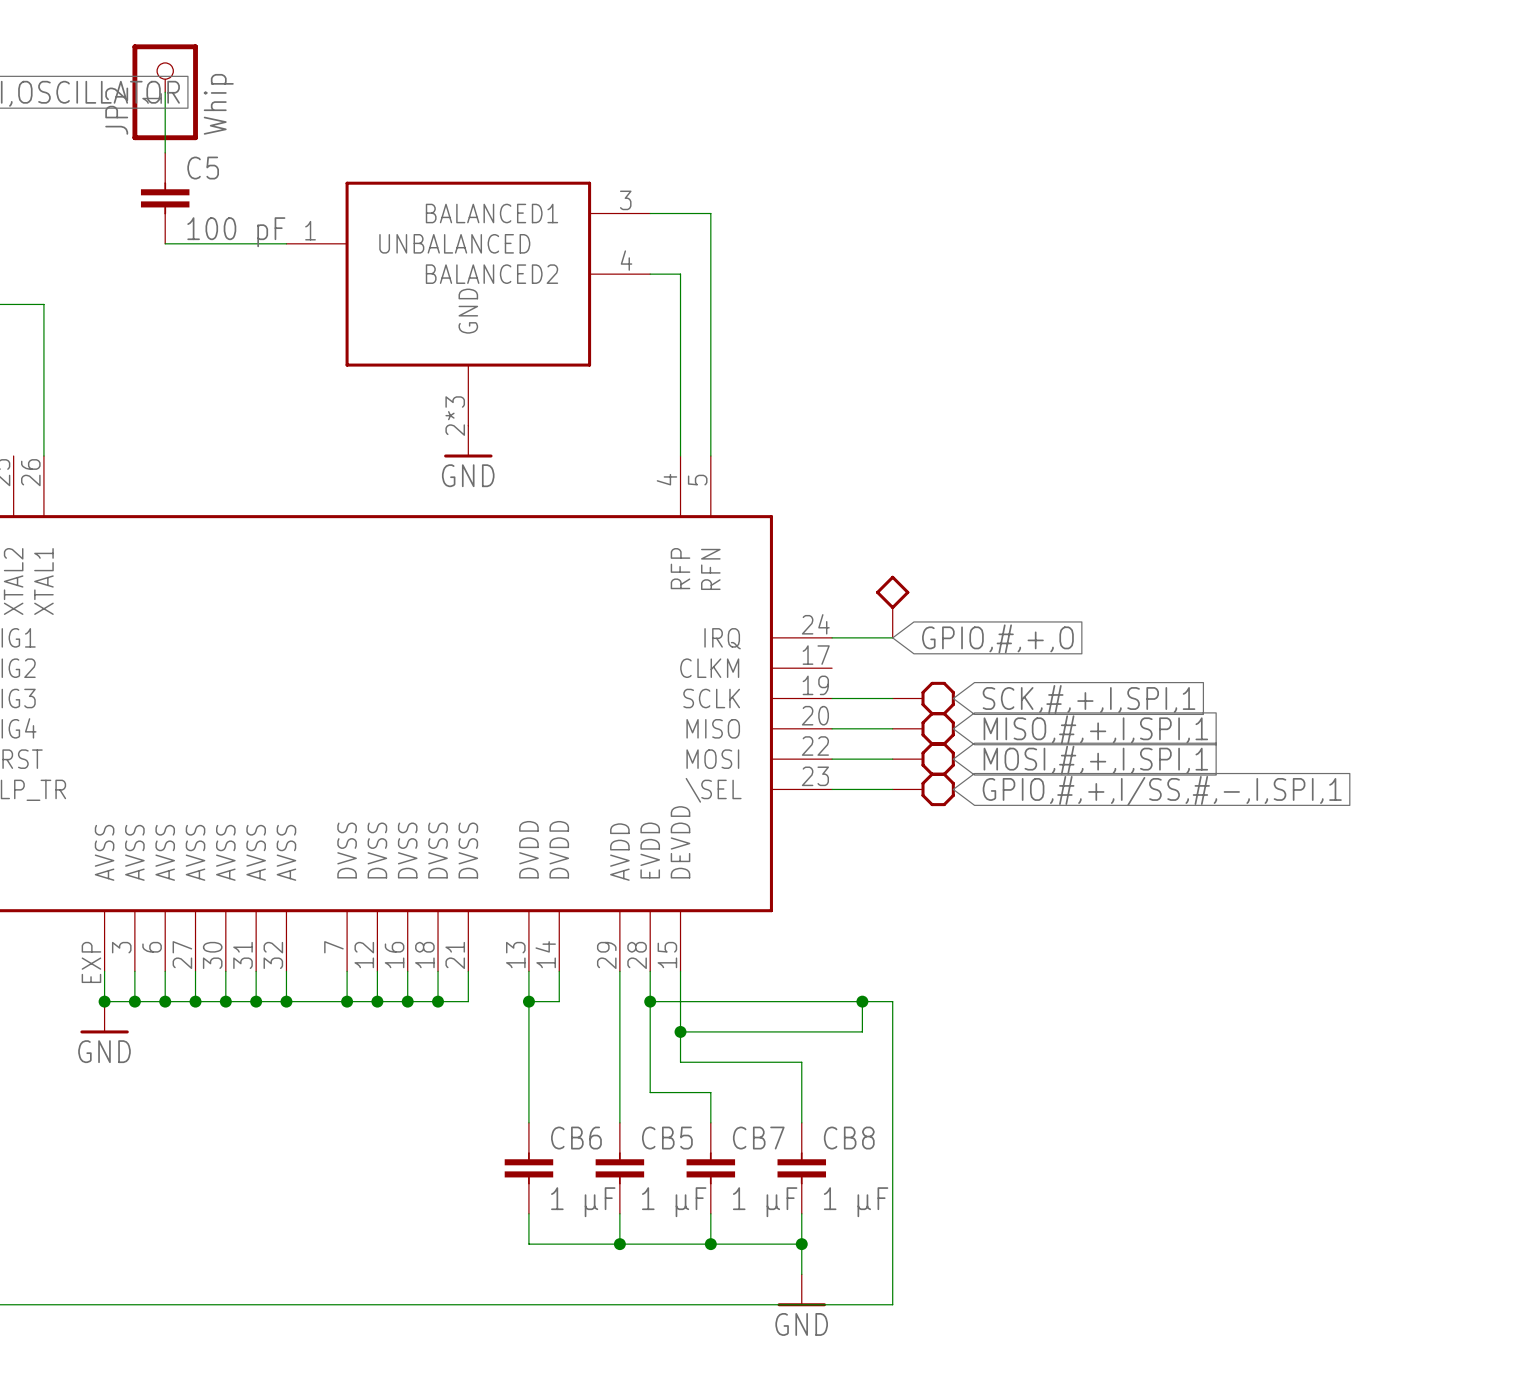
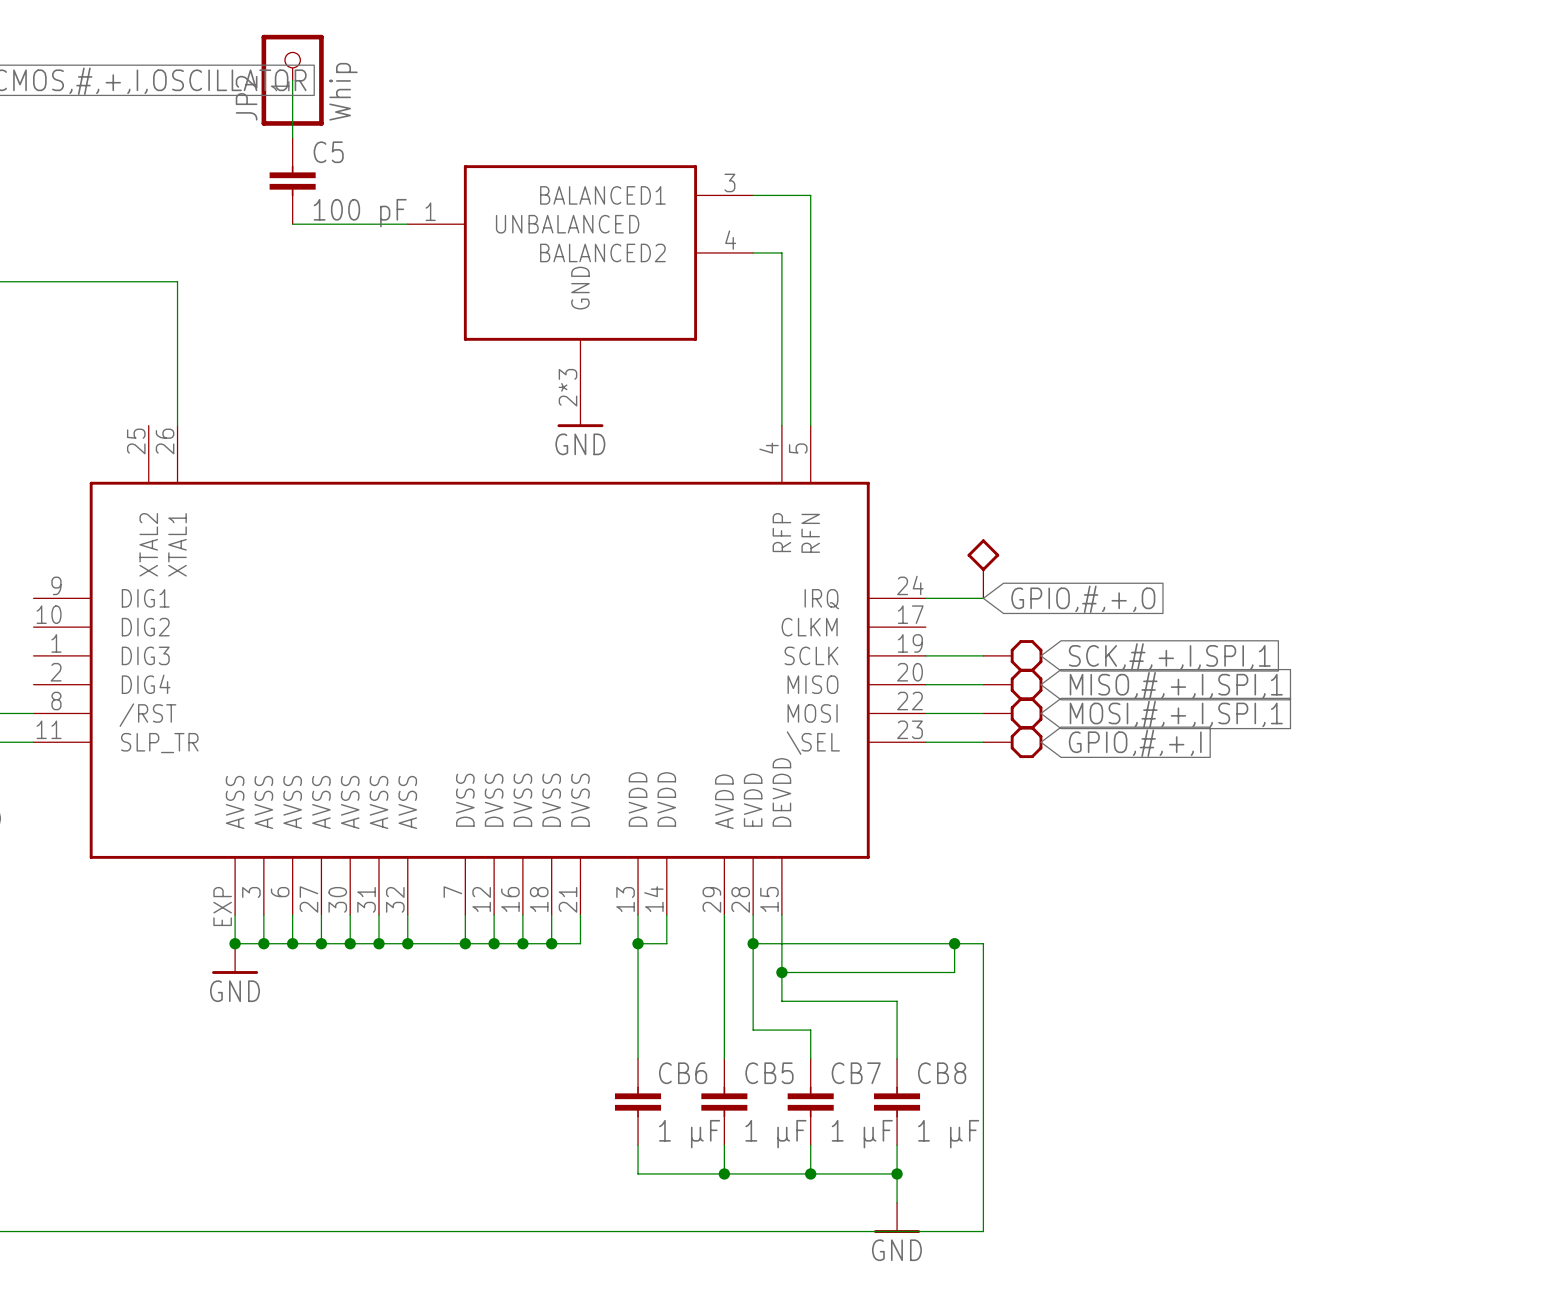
global label: GPIO,#,+,I/SS,#,-,I,SPI,1 (1162, 790) -> GPIO,#,+,I (1135, 743)

